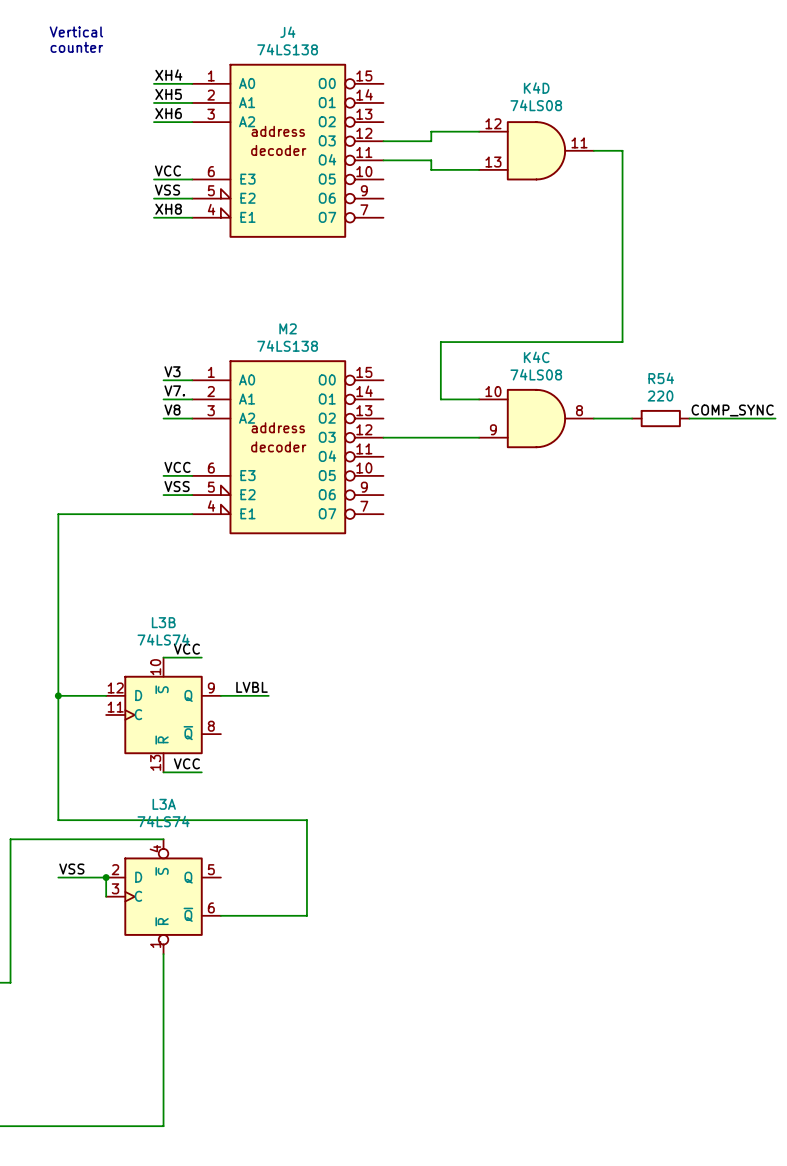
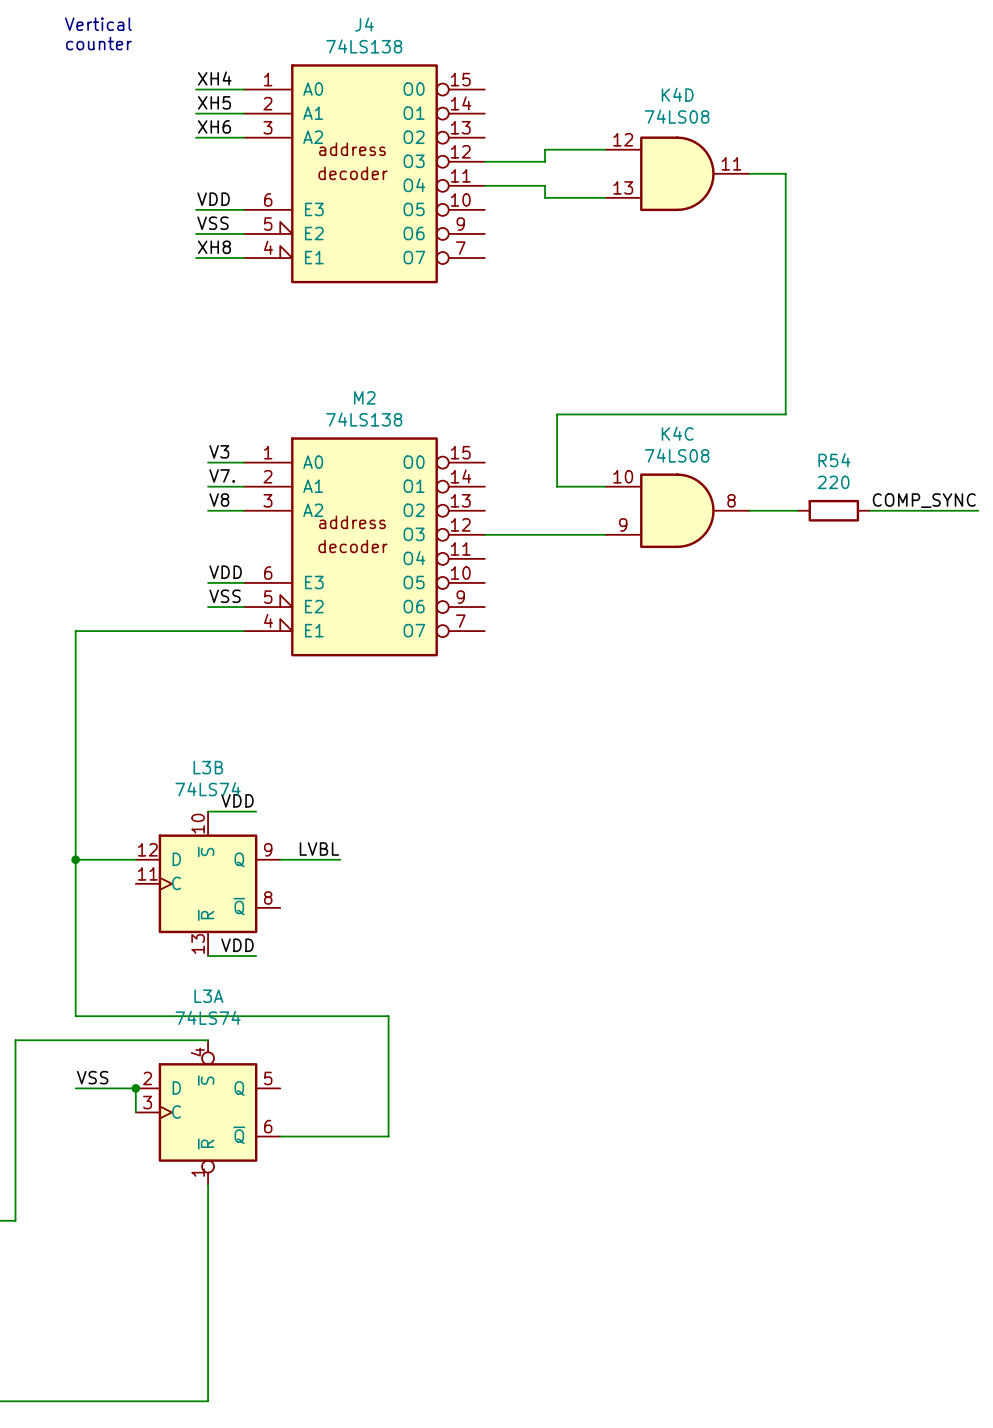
label: VCC (167, 170) -> VDD (213, 199)
label: VCC (177, 467) -> VDD (225, 572)
label: VCC (186, 649) -> VDD (237, 800)
label: VCC (186, 763) -> VDD (237, 945)

